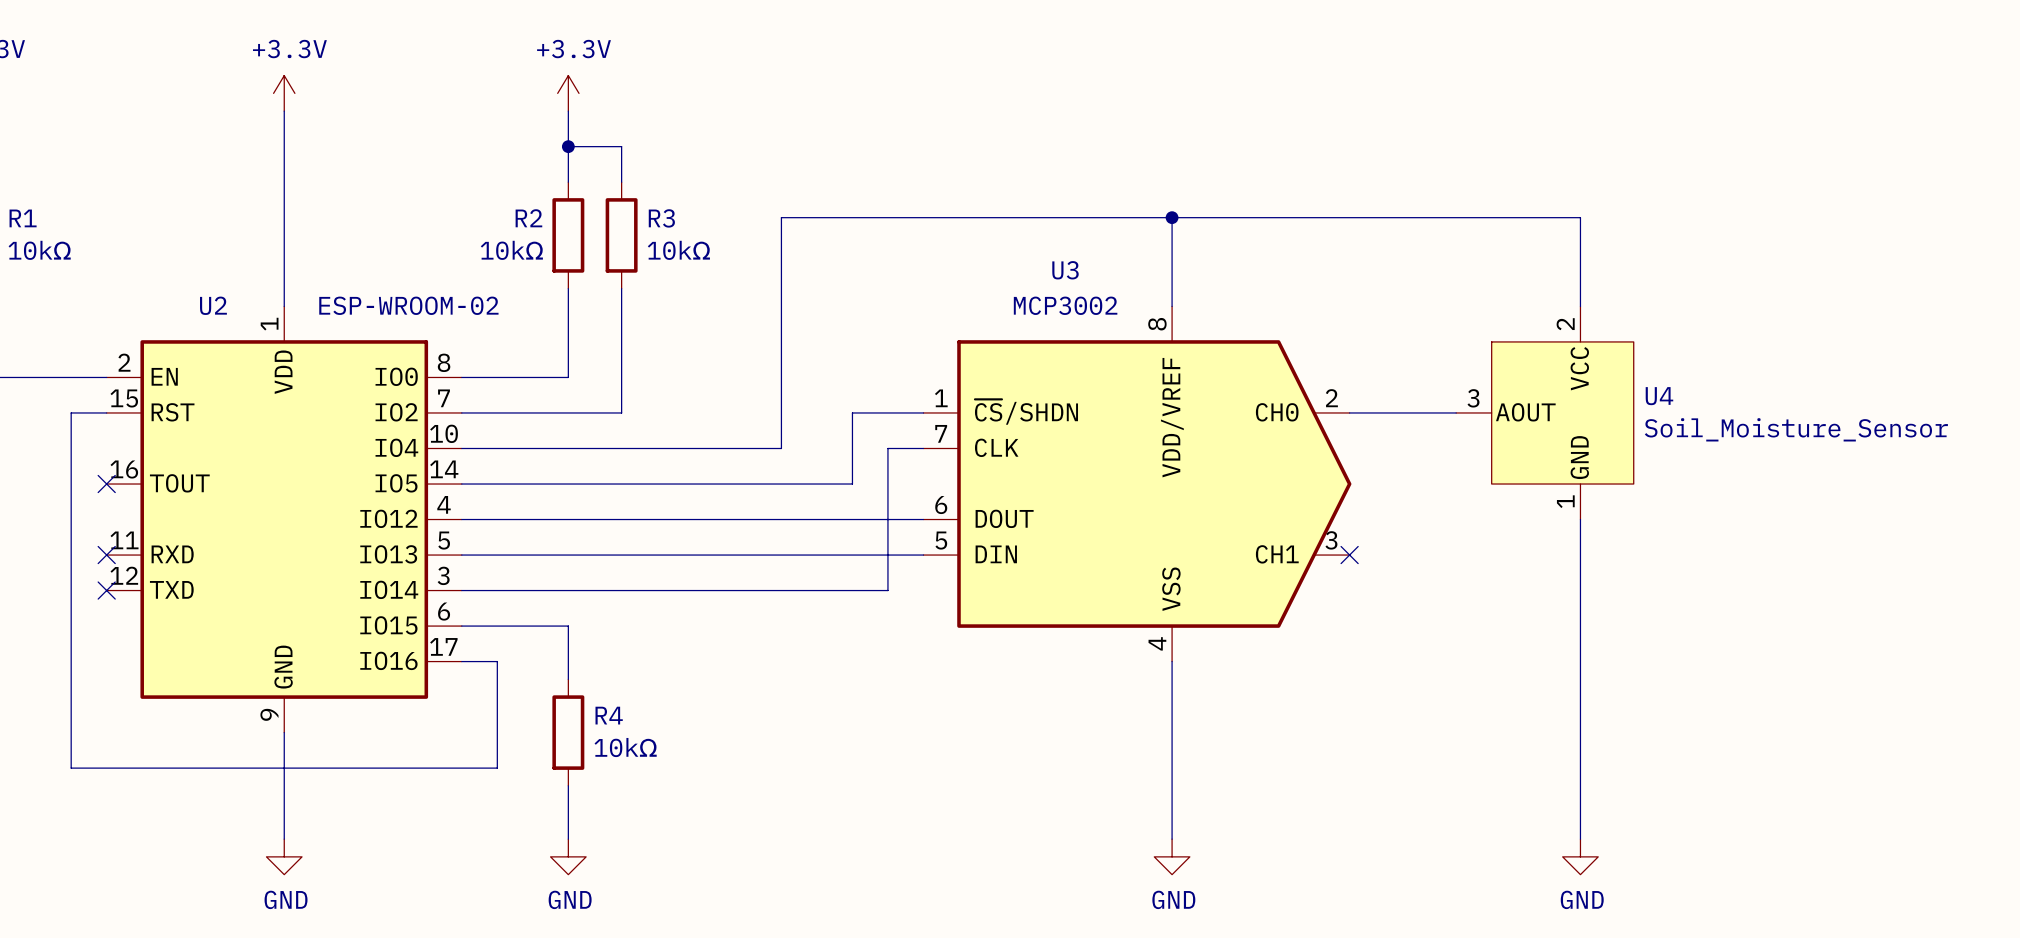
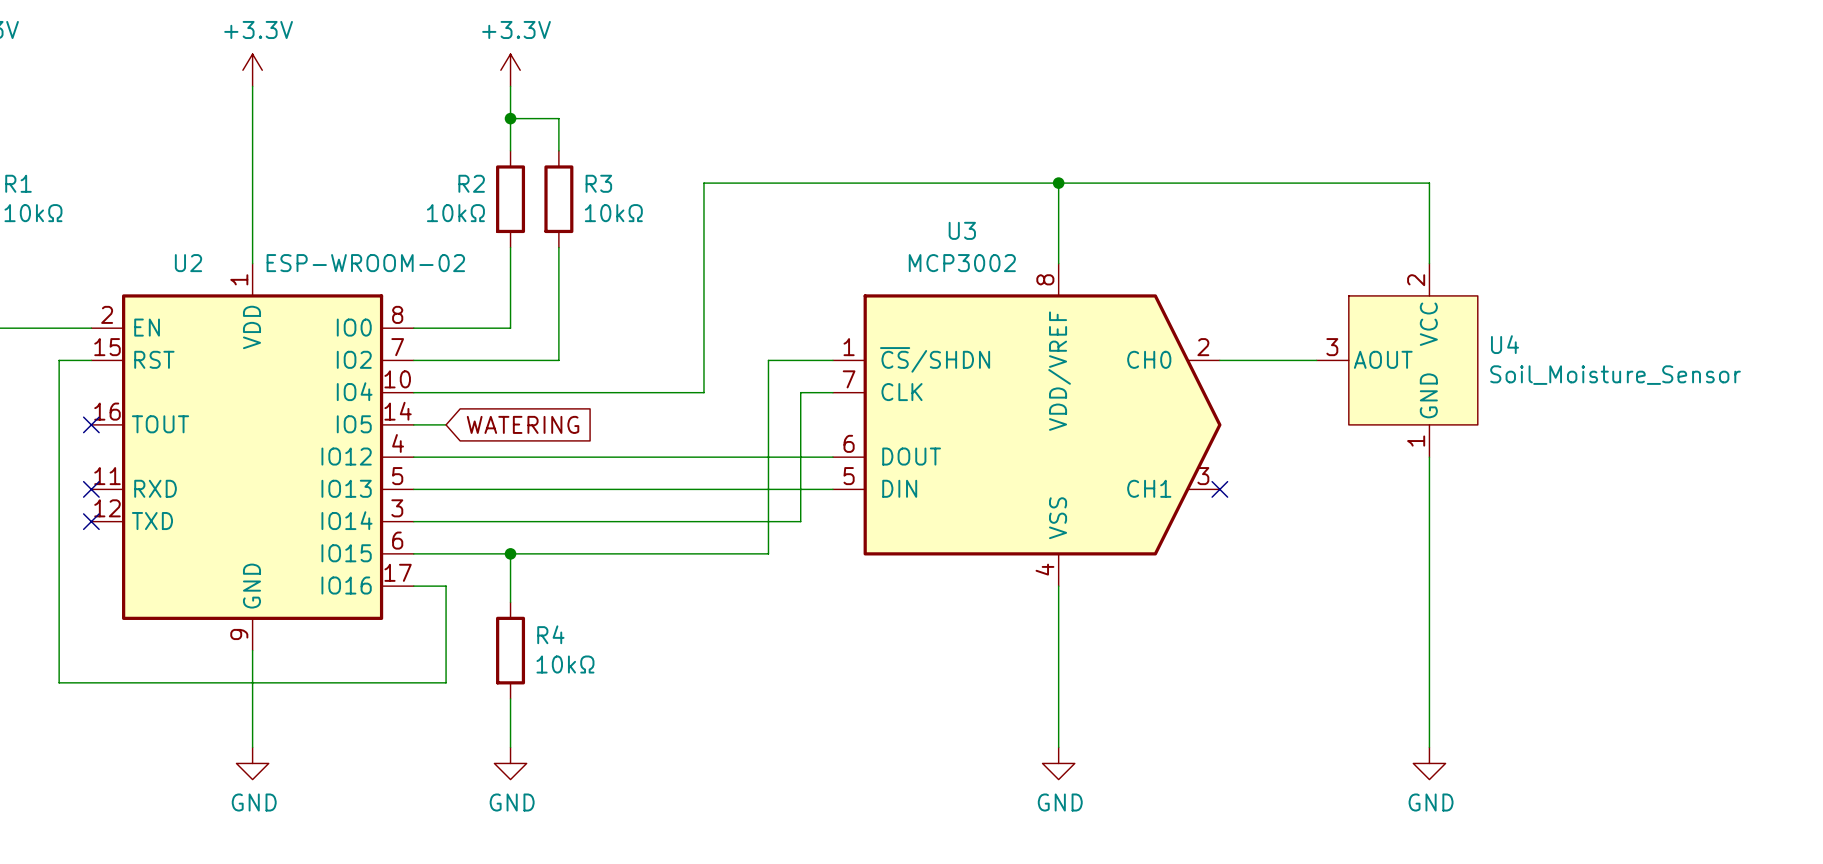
wire: (497, 484) (852, 484) -> (510, 553) (768, 553) (768, 424)
global label: none -> WATERING (523, 424)
junction: none -> (510, 553)

